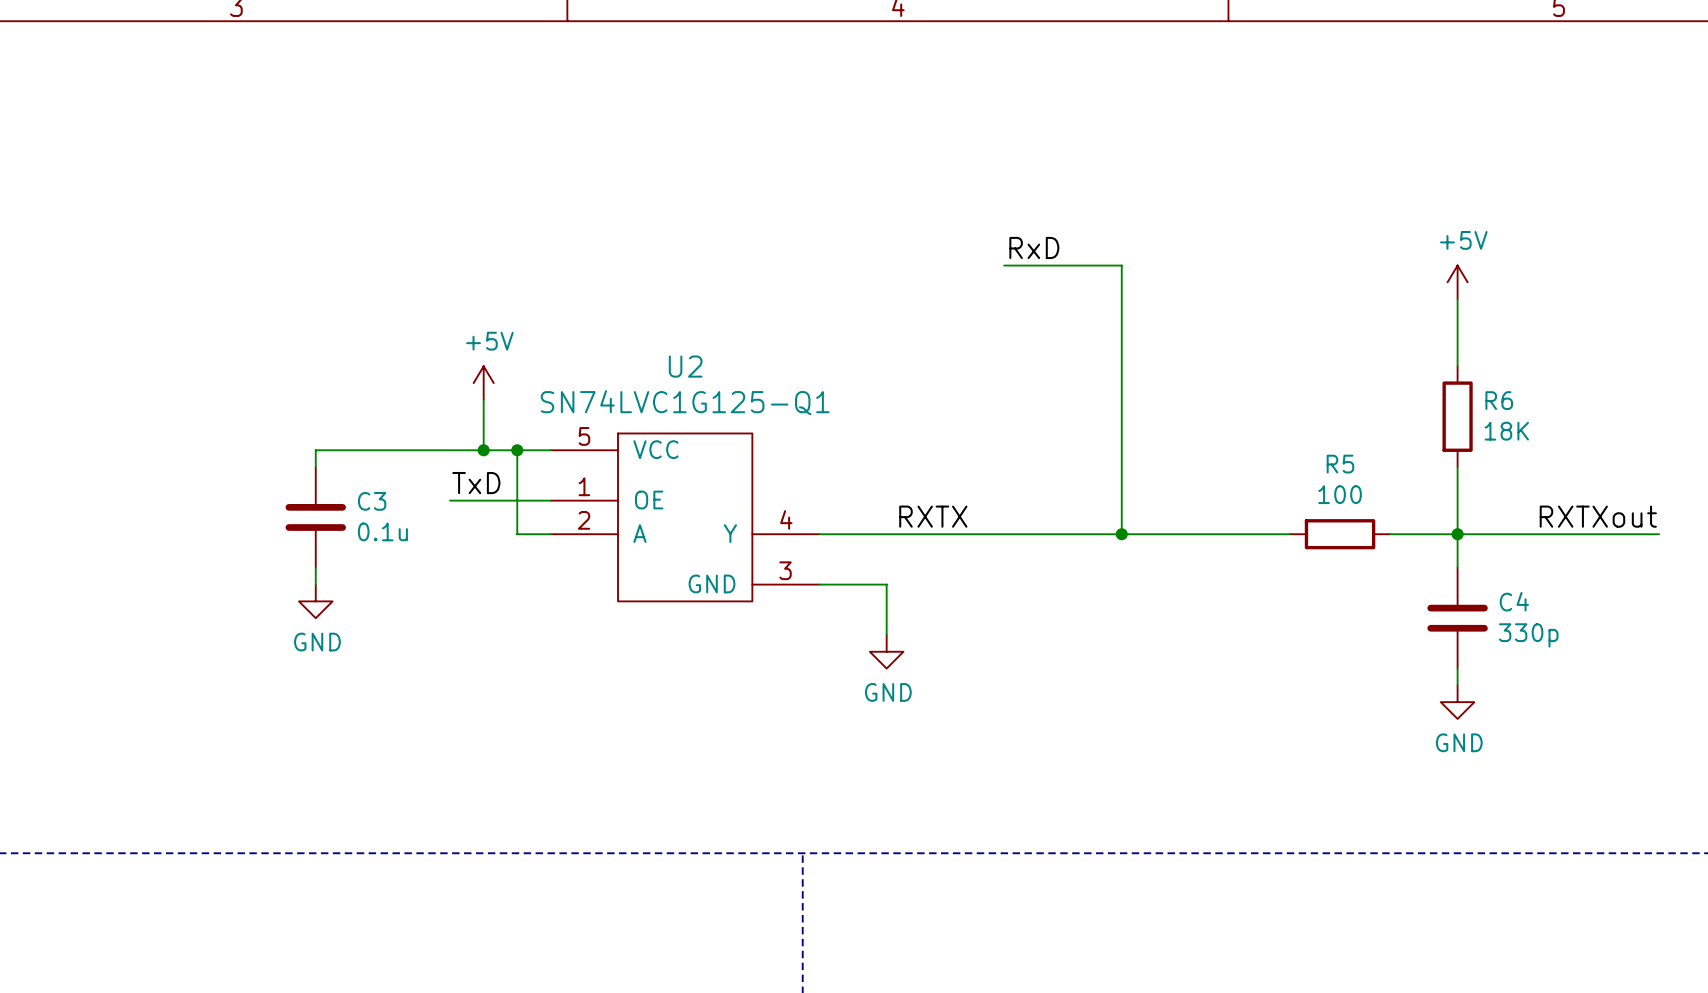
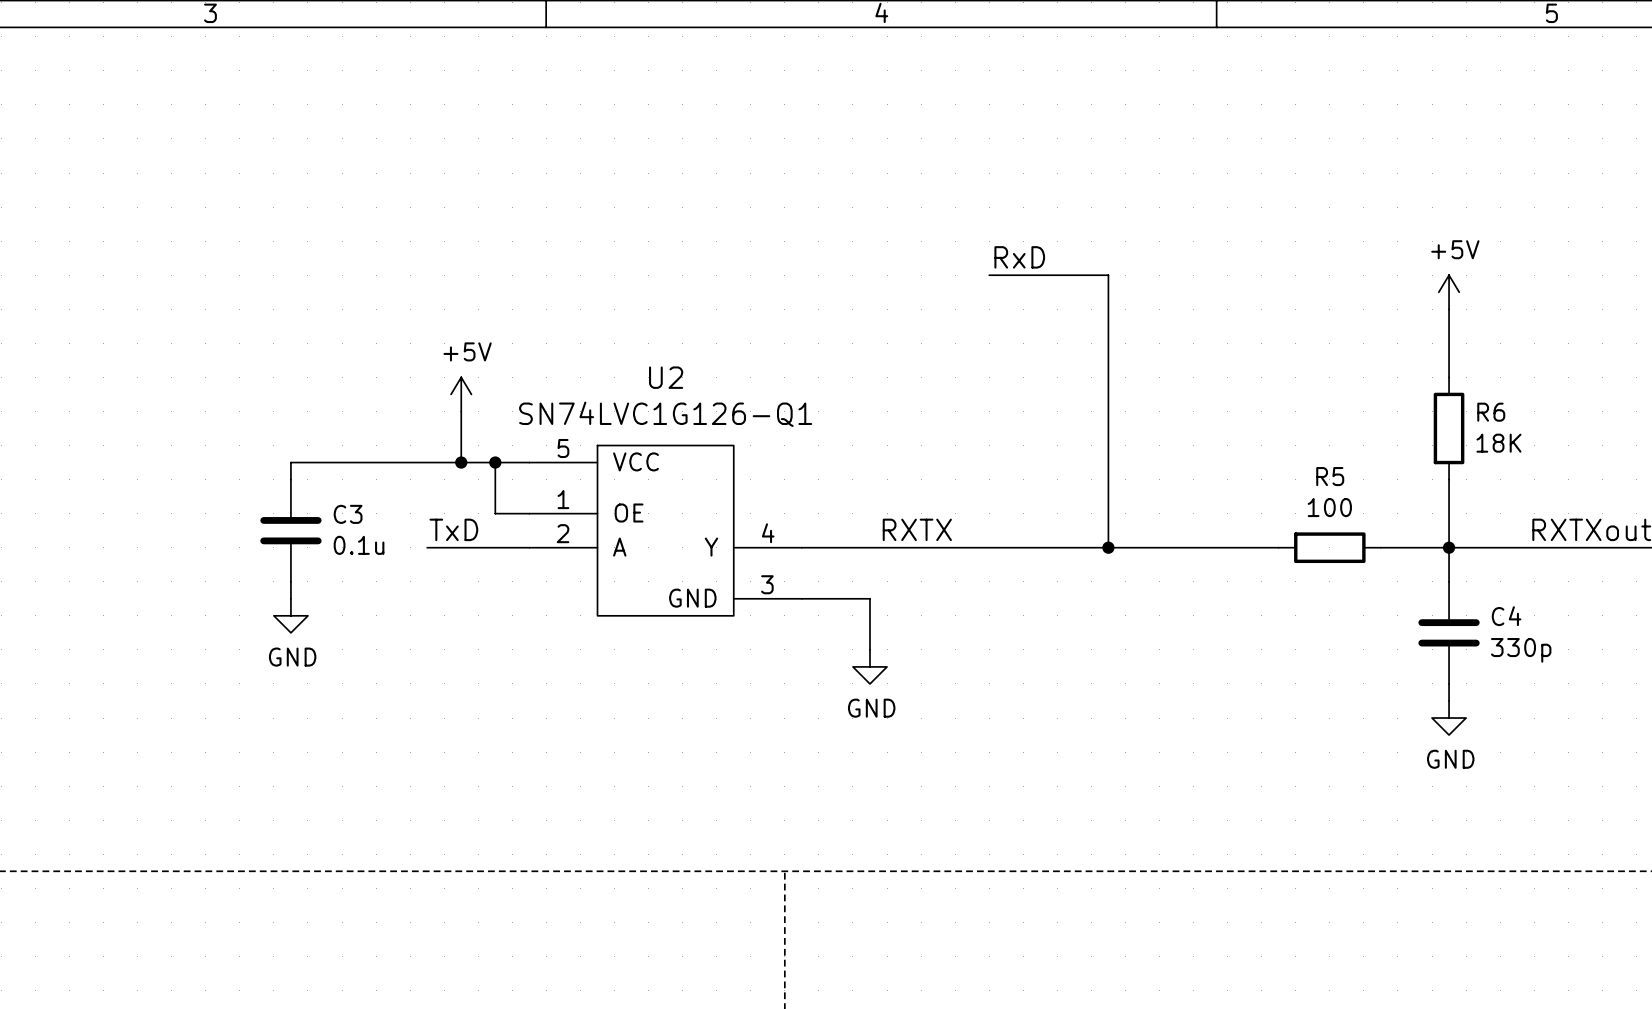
U2 value: SN74LVC1G125-Q1 (685, 402) -> SN74LVC1G126-Q1 (665, 414)
label position: TxD (476, 483) -> TxD (453, 529)
wire: (450, 500) (517, 500) (517, 534) -> (427, 547) (495, 547)

